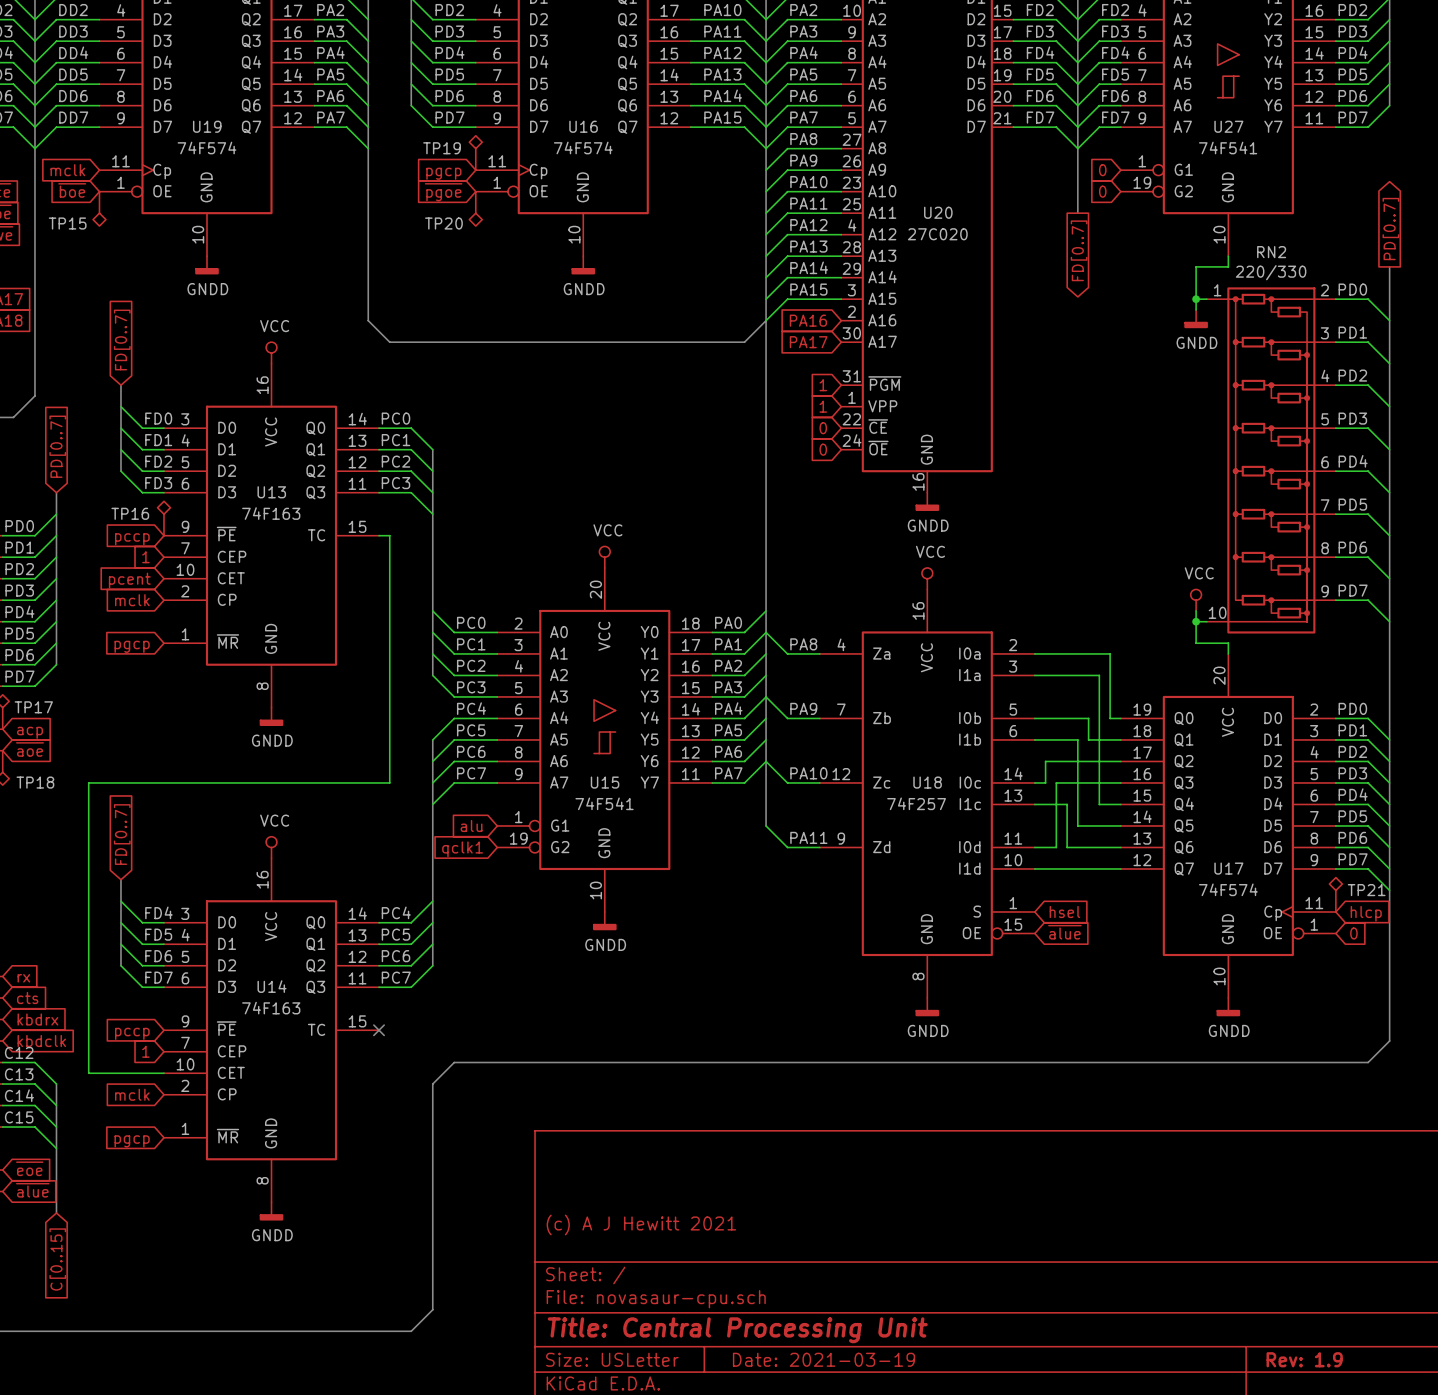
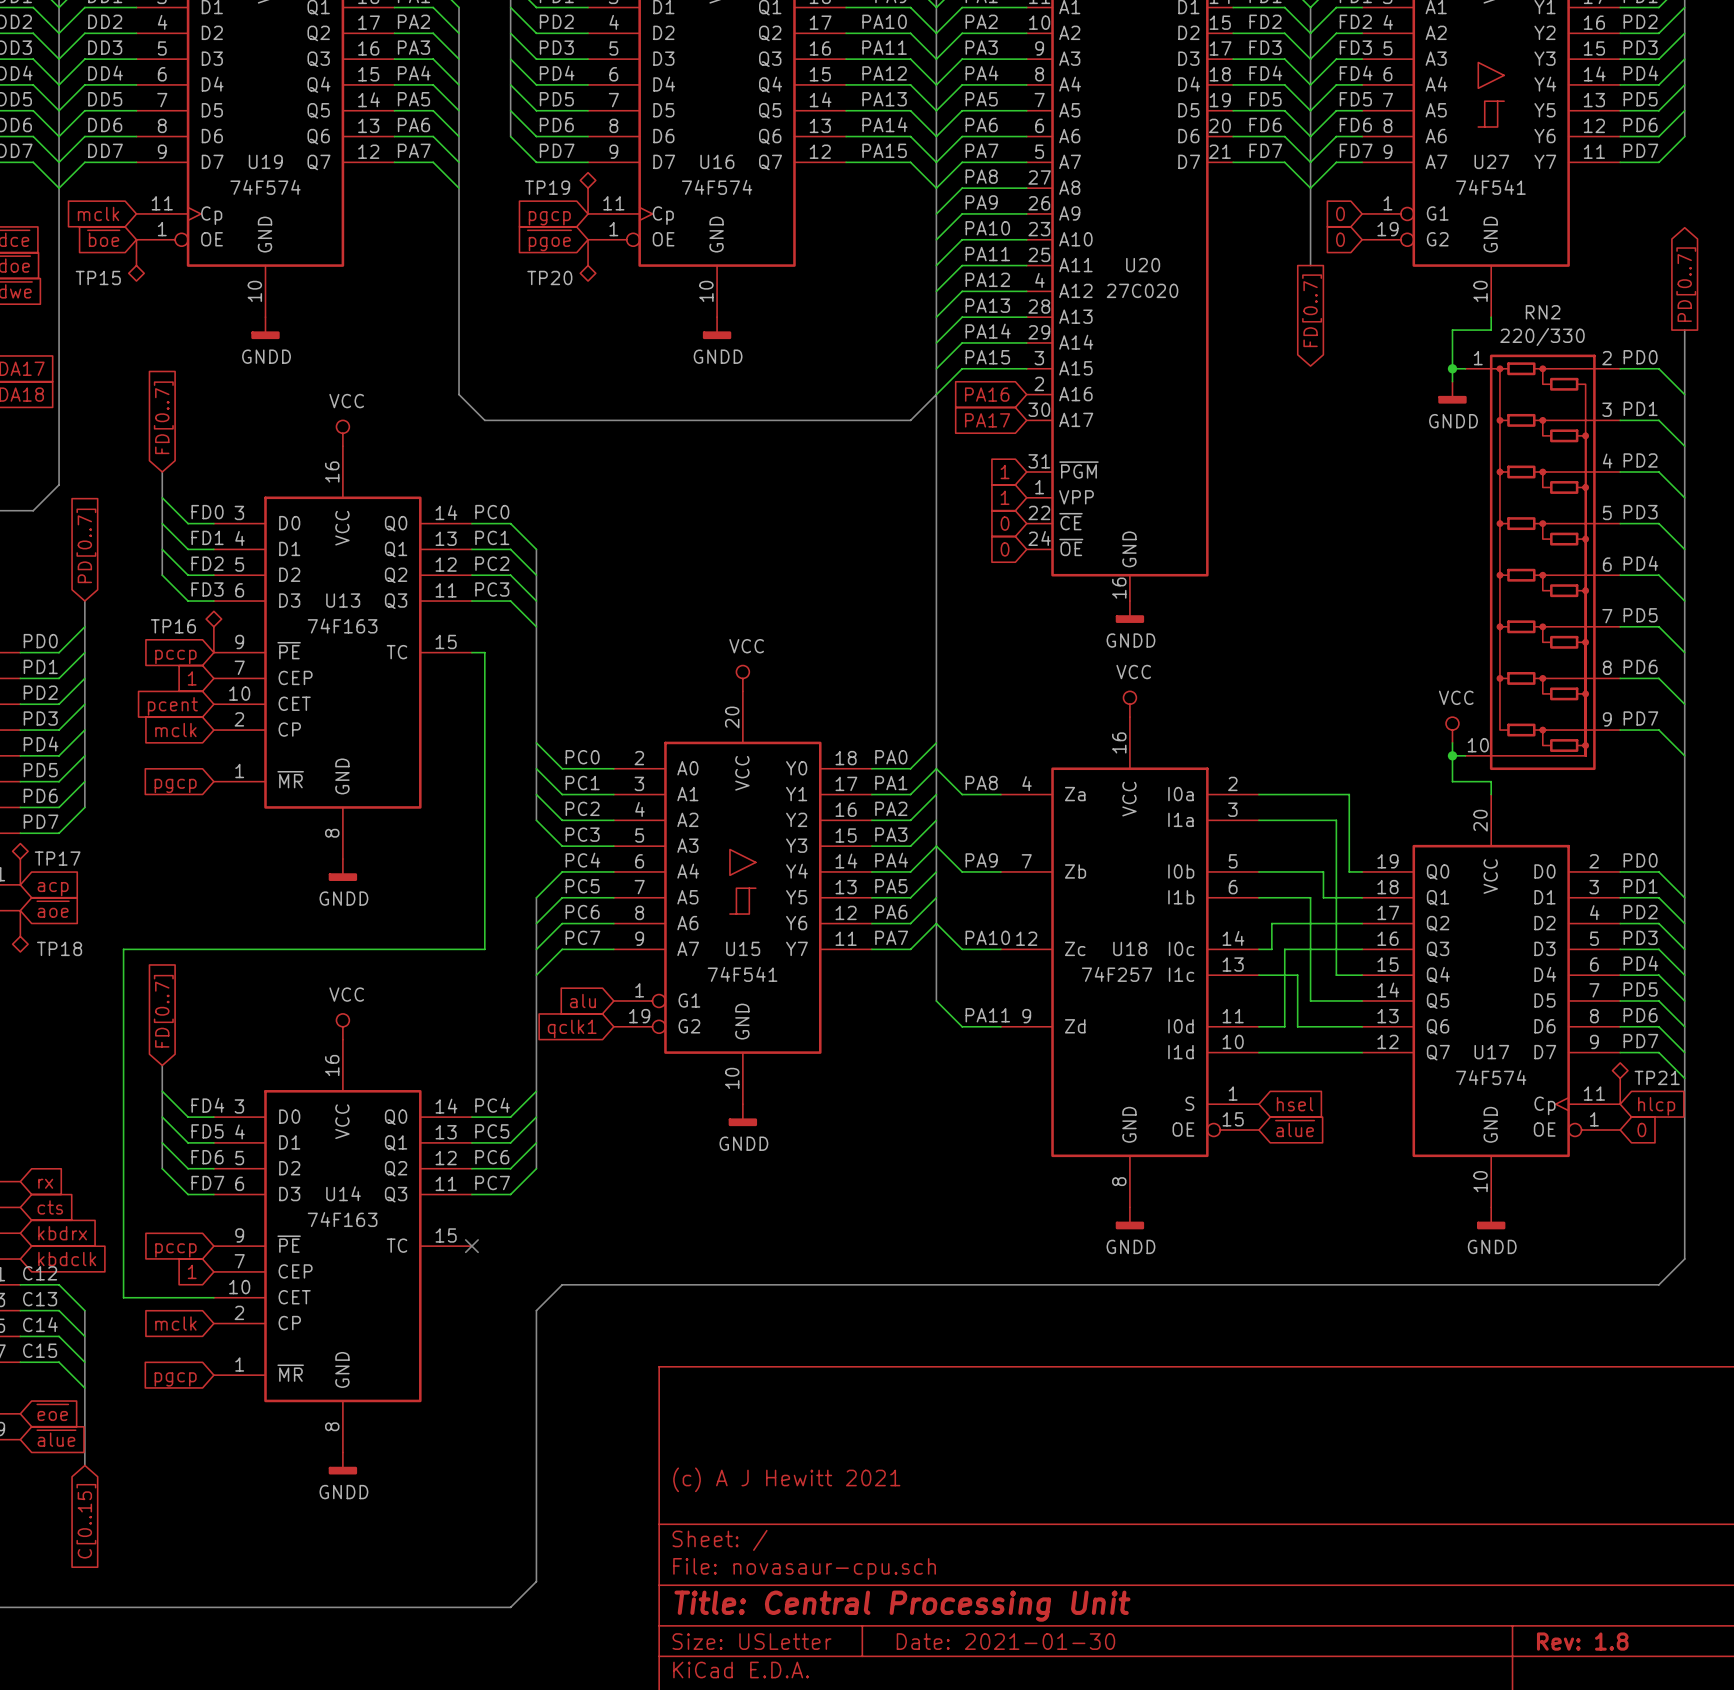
title block: Date: 2021-03-19 (824, 1359) -> Date: 2021-01-30 (1005, 1641)
title block: Rev: 1.9 (1304, 1359) -> Rev: 1.8 (1582, 1641)

